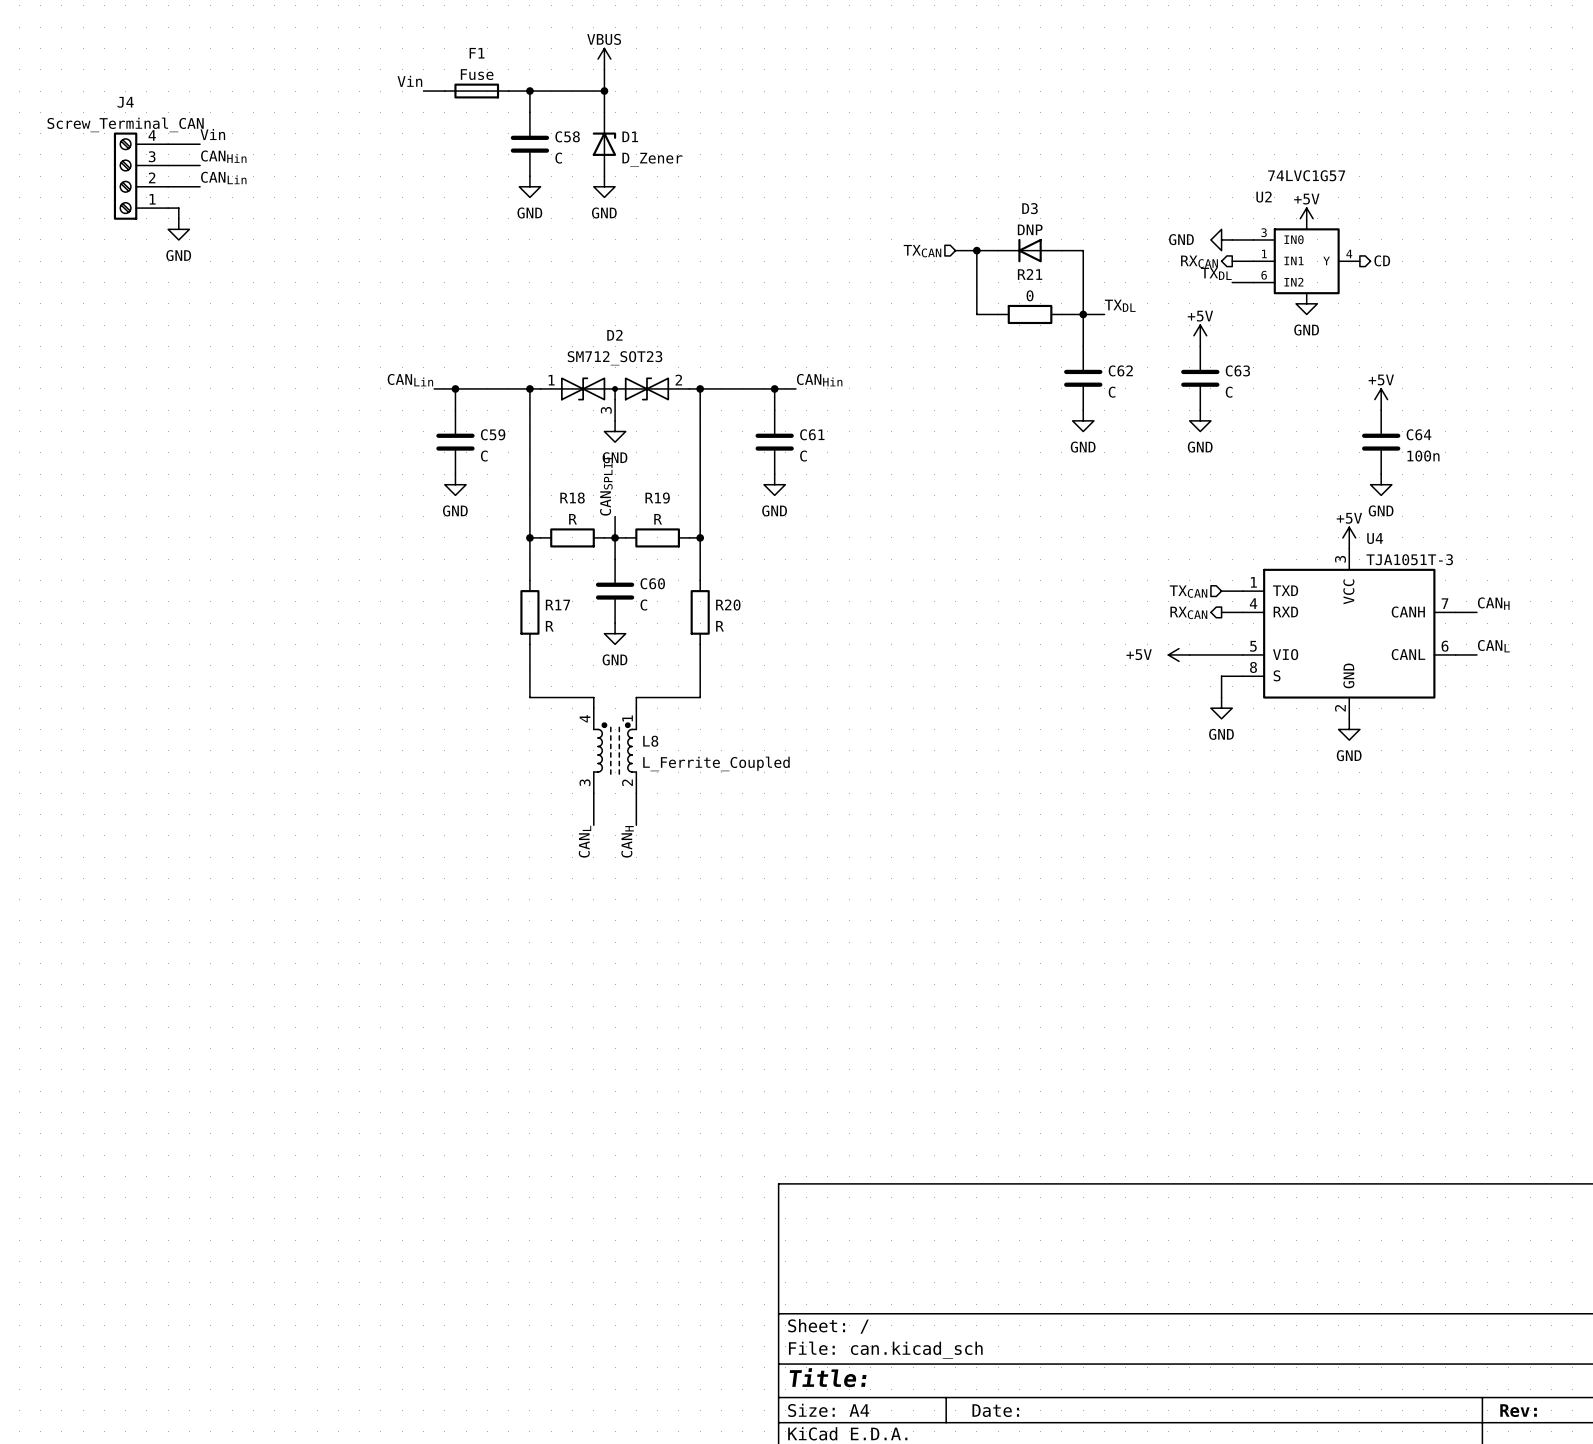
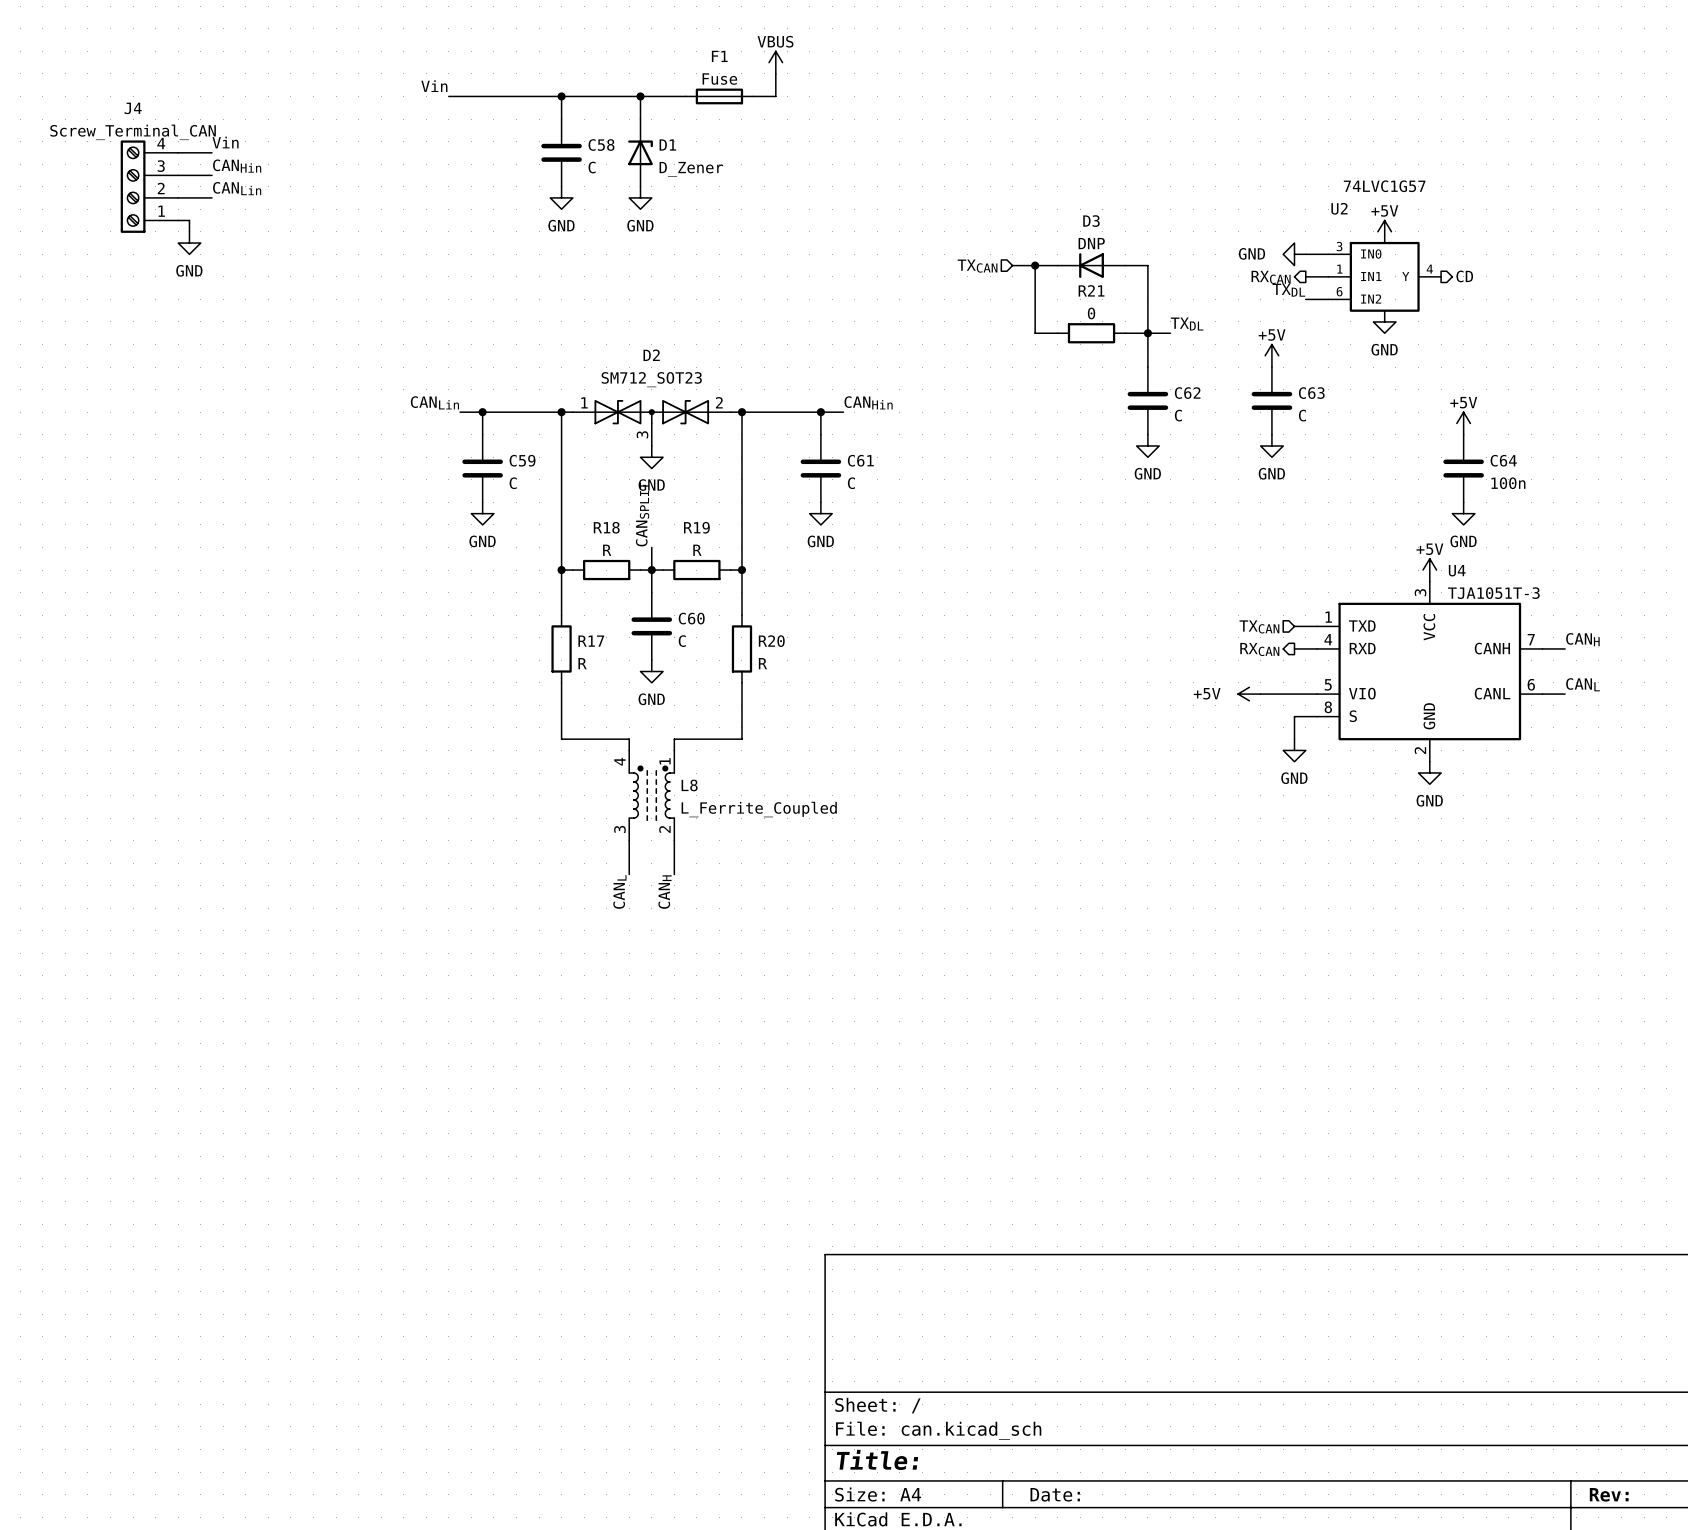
power symbol position: VBUS (604, 59) -> VBUS (775, 62)
wire: (604, 69) (604, 91) -> (685, 96) (640, 96)
wire: none -> (775, 73) (775, 96) (753, 96)
F1 position: (476, 91) -> (719, 96)

